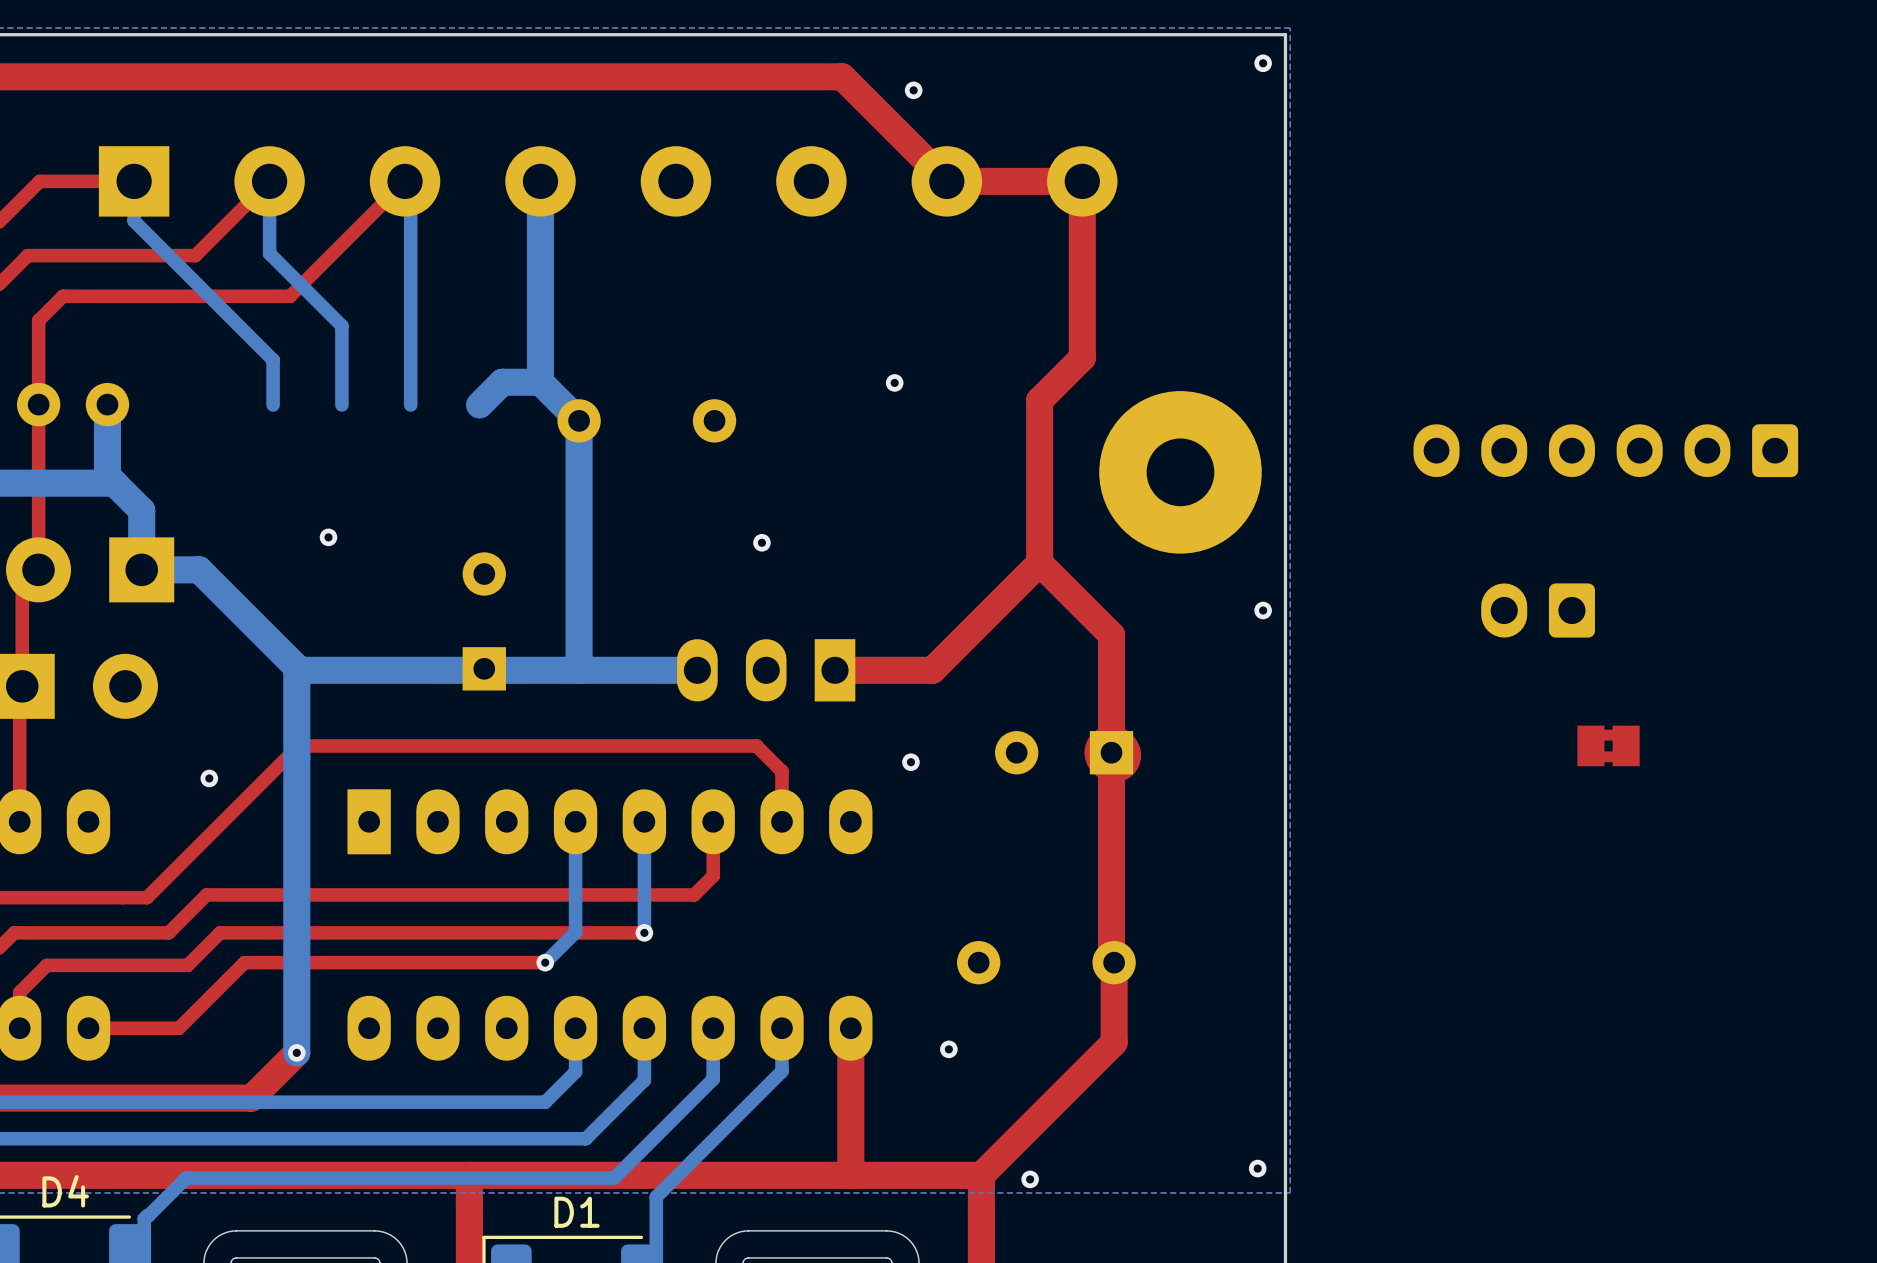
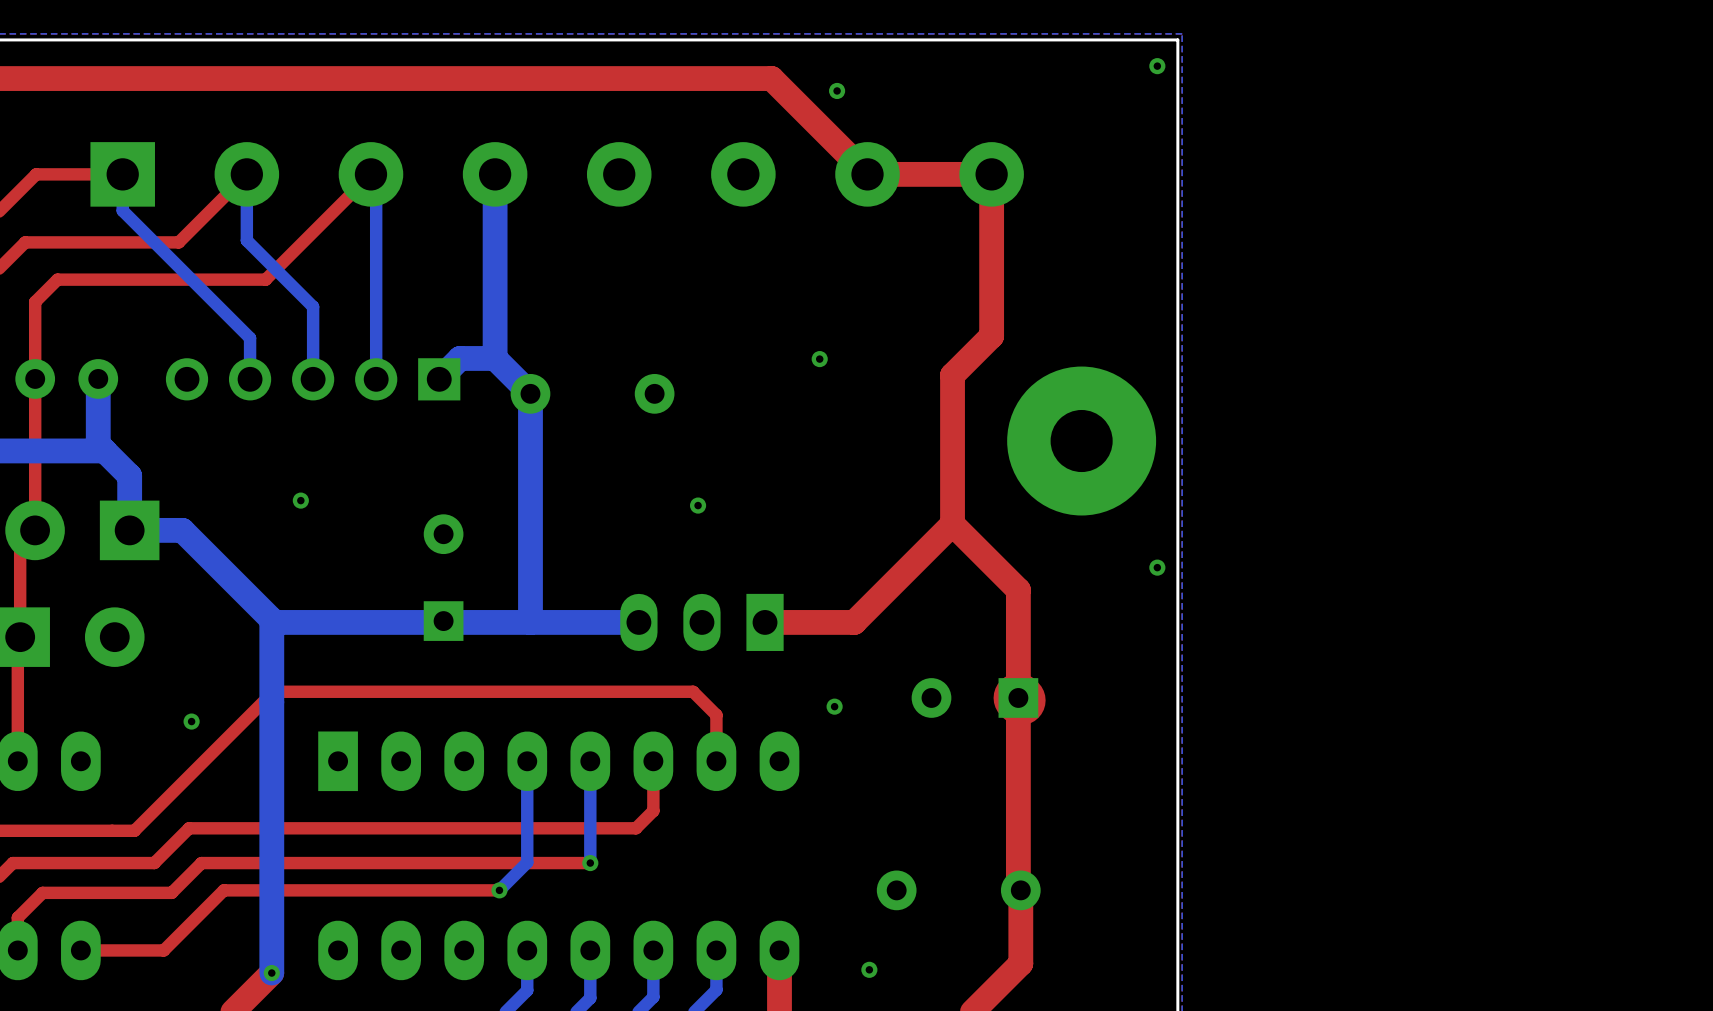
part: none -> (313, 379)
part: (1605, 450) -> none
part: (1538, 610) -> none
part: (1608, 745) -> none

